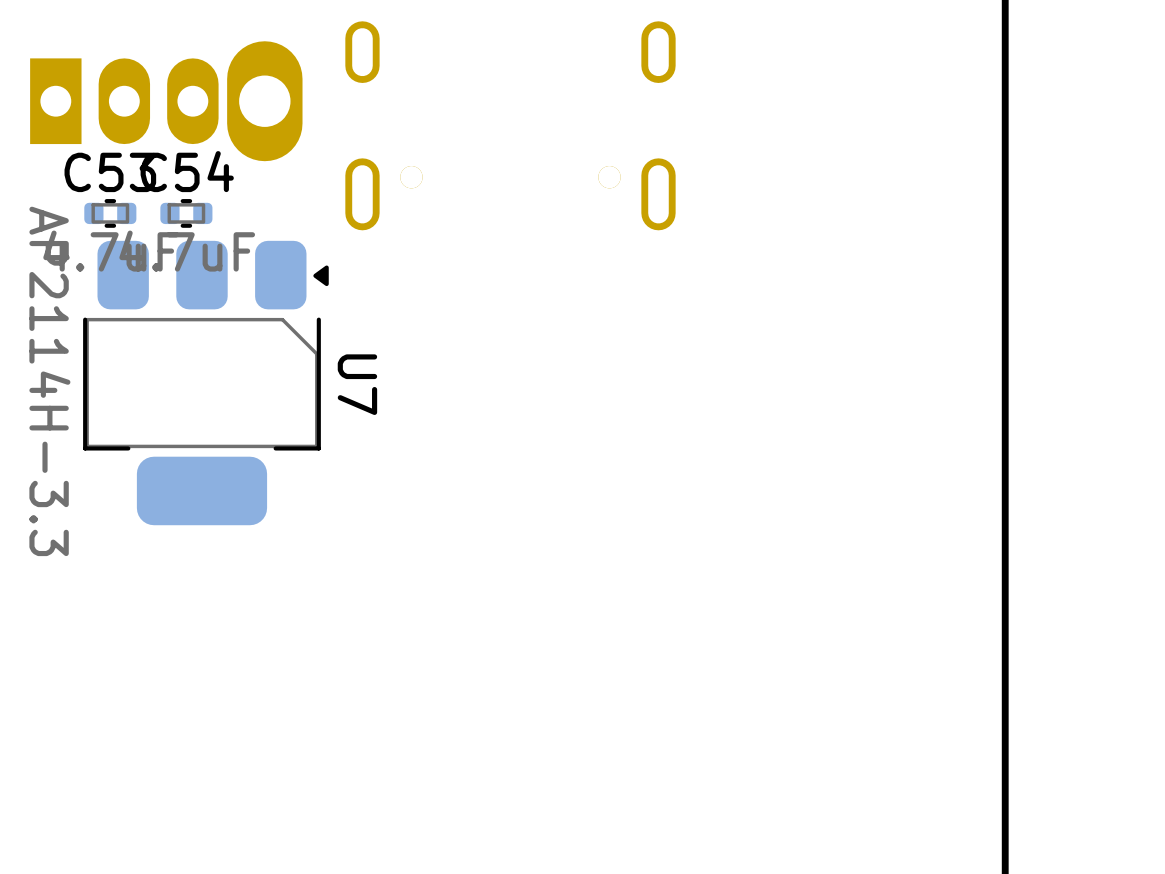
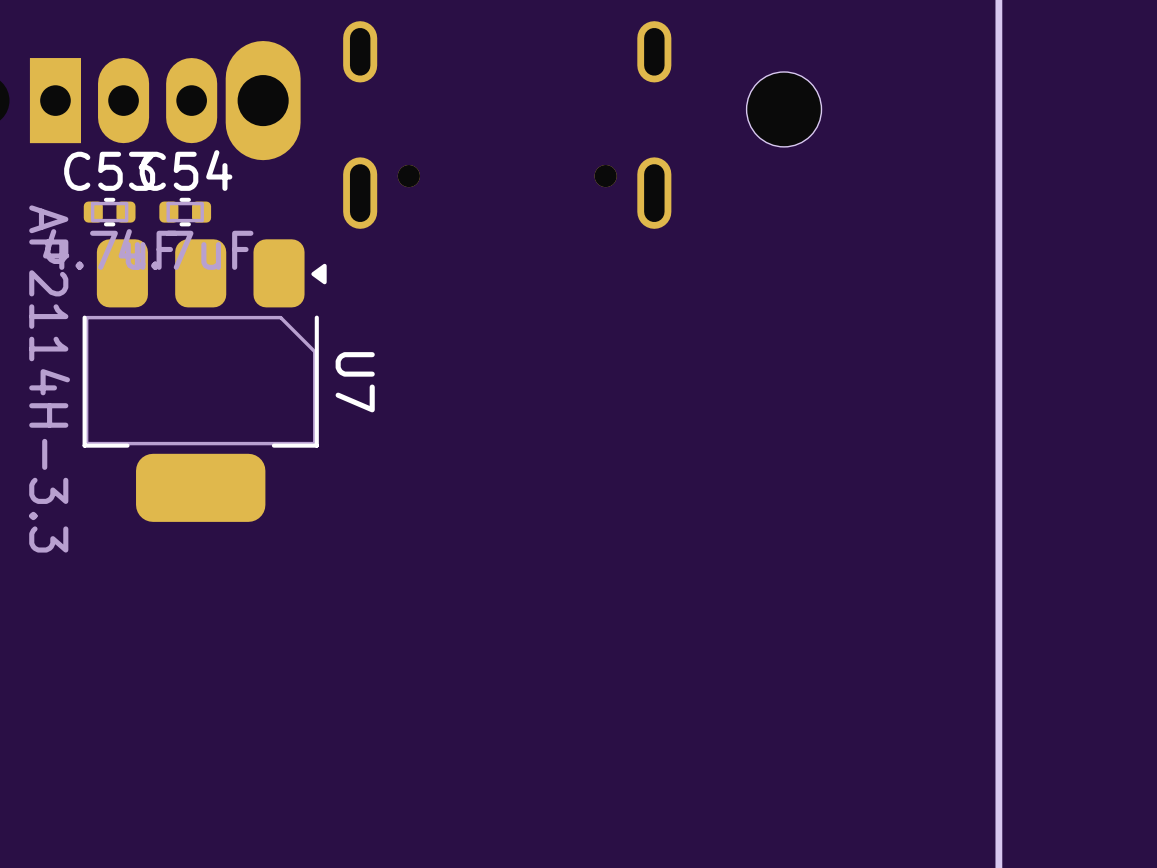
part: none -> (784, 109)

